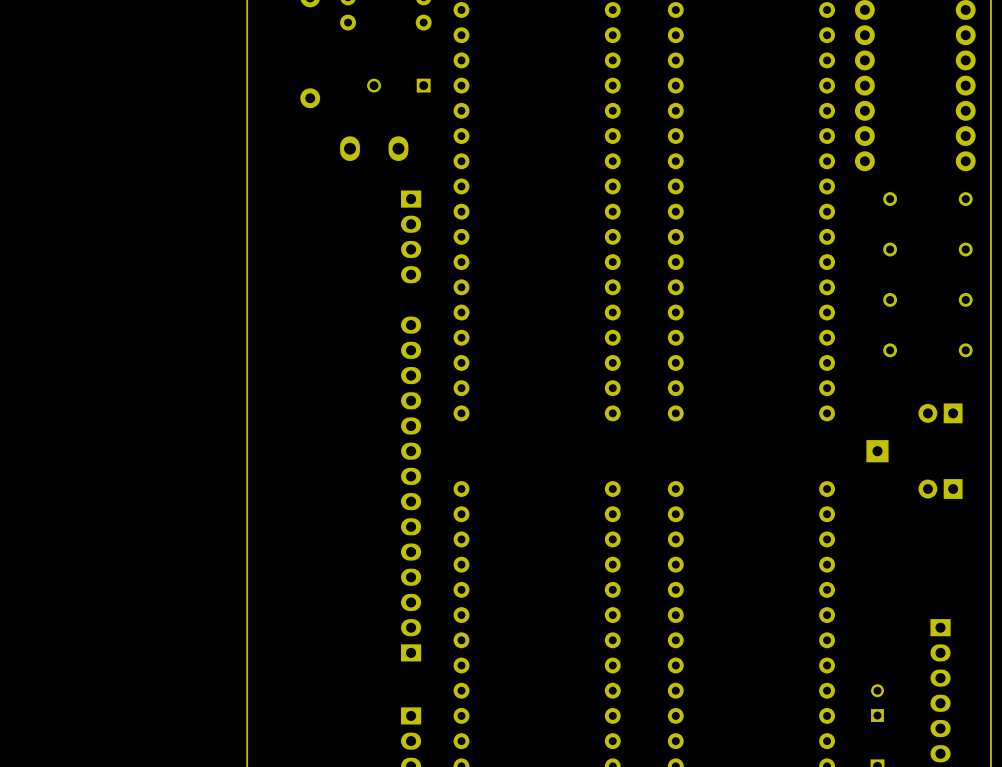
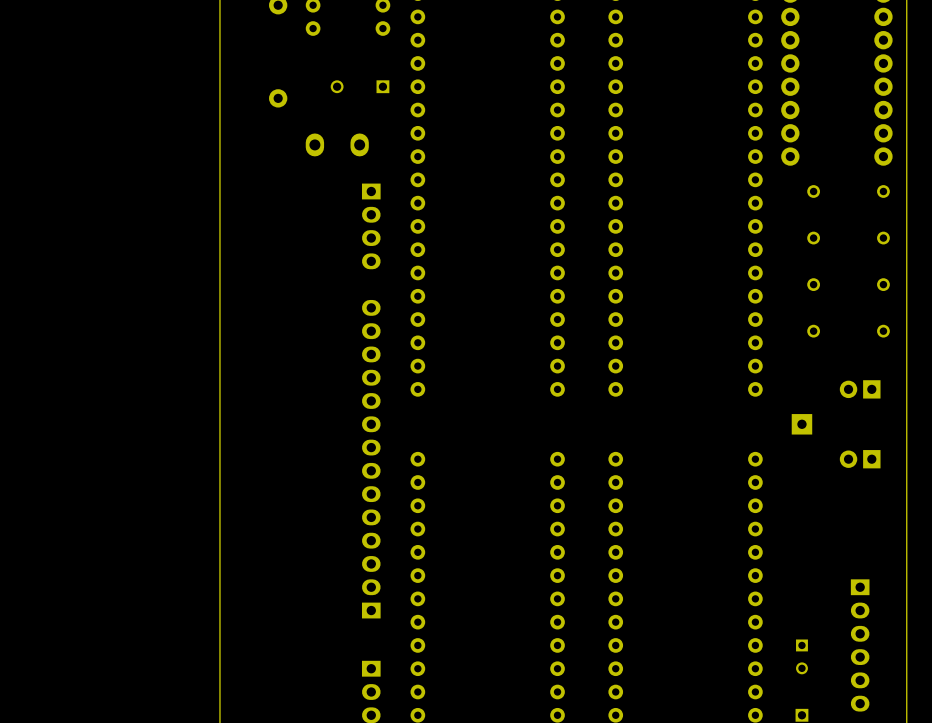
part rotation: 0° (877, 703) -> 180° (801, 656)

